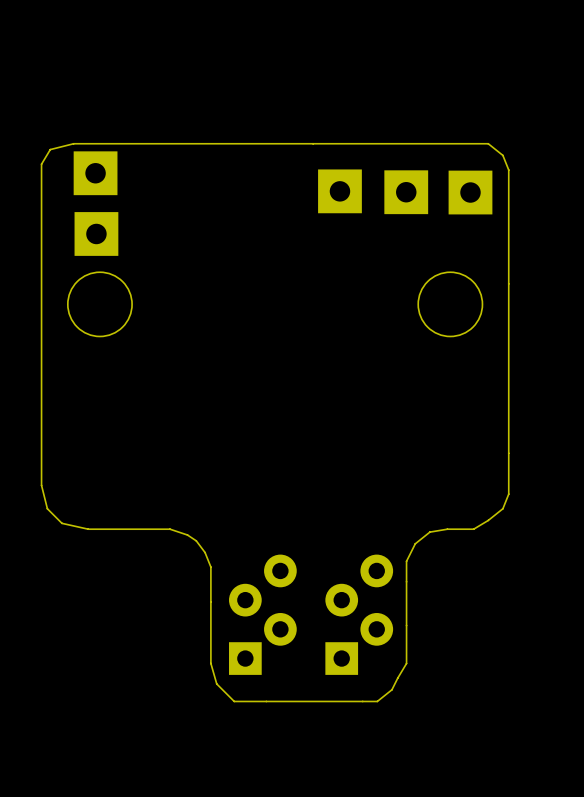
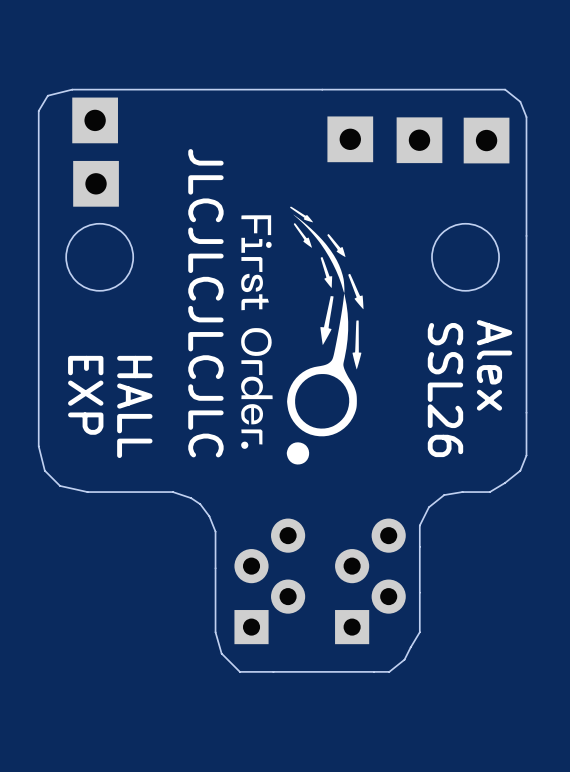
drawing: none -> [241, 206, 364, 465]
text: none -> JLCJLCJLCJLC (205, 303)
text: none -> Alex (494, 365)
text: none -> SSL26 (445, 390)
text: none -> EXP (85, 395)
text: none -> HALL (134, 406)

